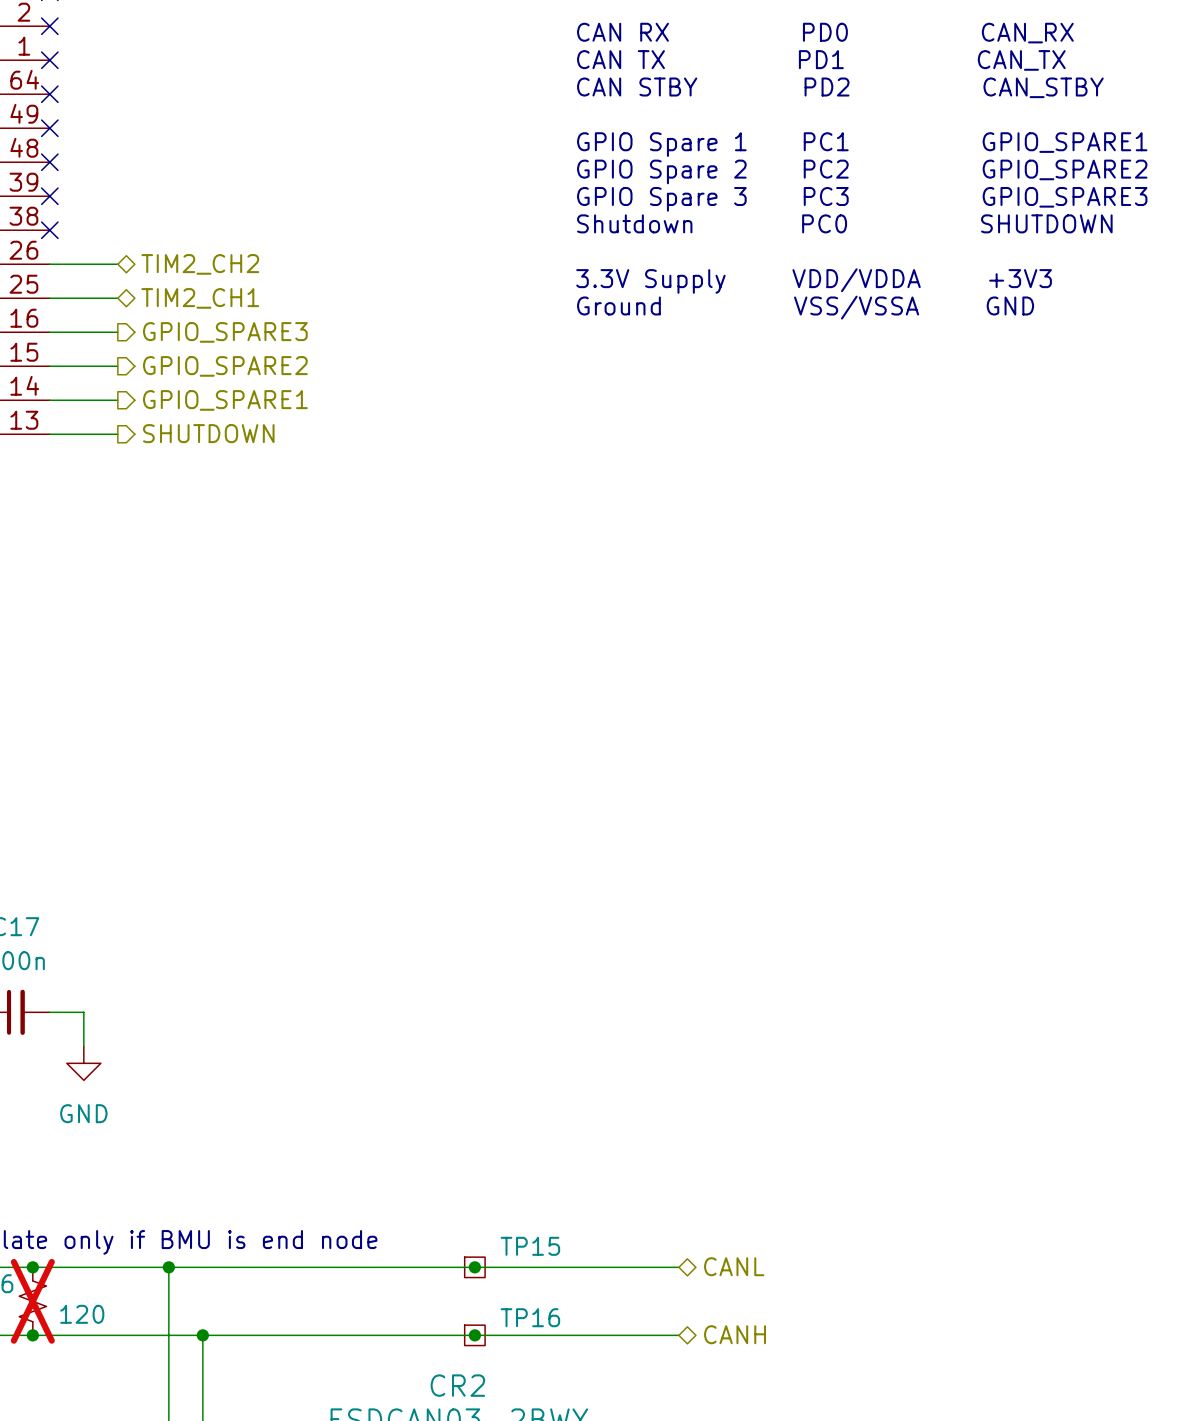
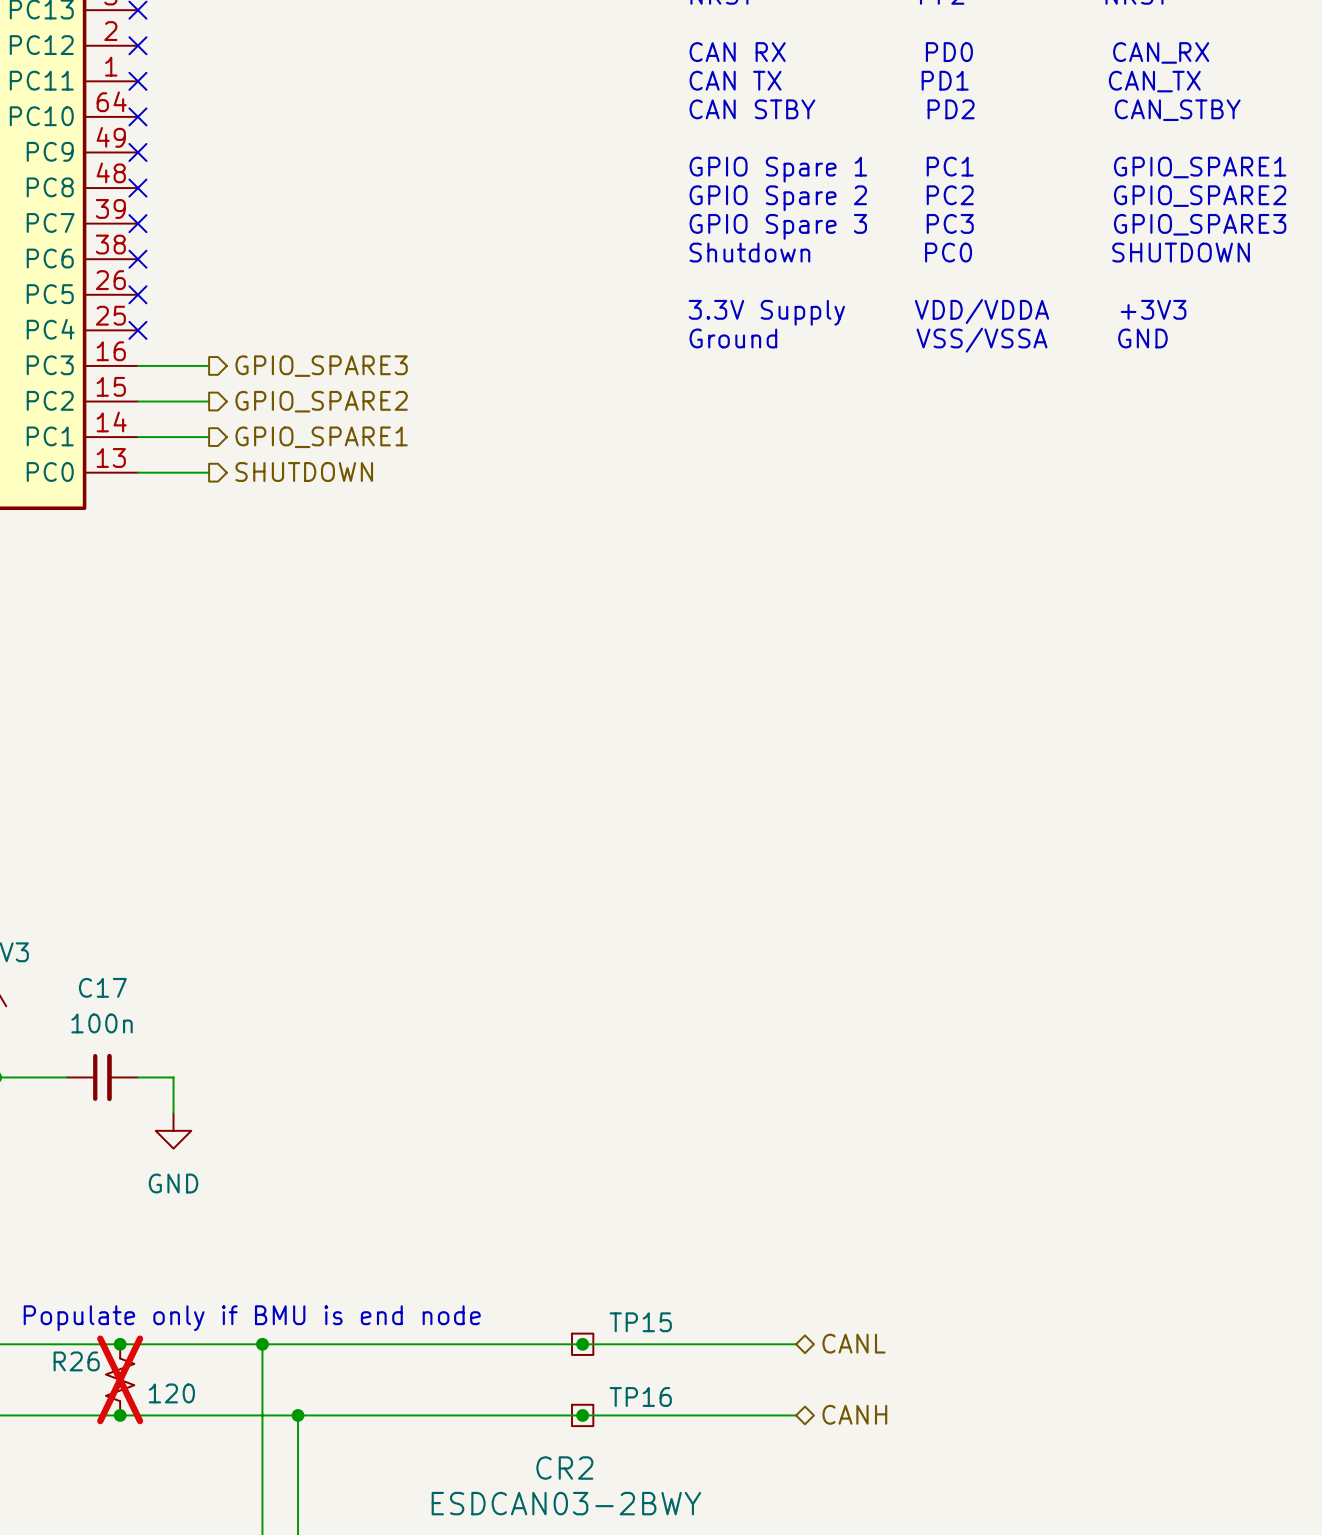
wire: (49, 264) (117, 264) -> none
no-connect mark: none -> (137, 294)
hierarchical label: TIM2_CH2 (200, 264) -> none
wire: (49, 298) (117, 298) -> none
no-connect mark: none -> (137, 330)
hierarchical label: TIM2_CH1 (200, 298) -> none

